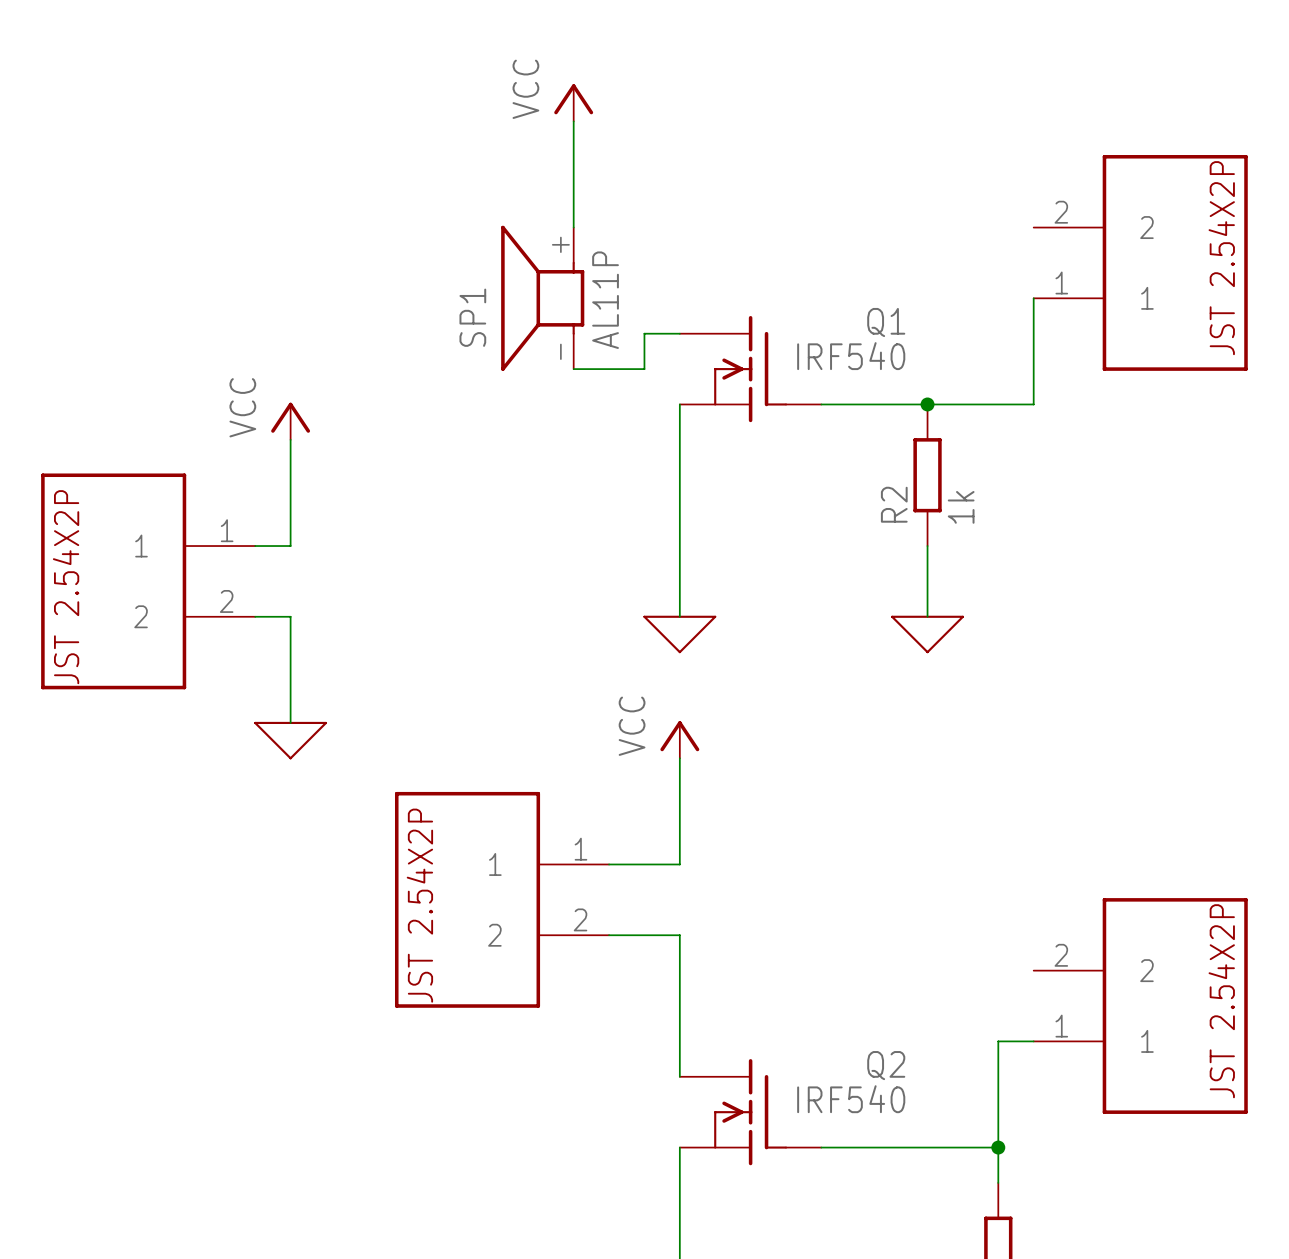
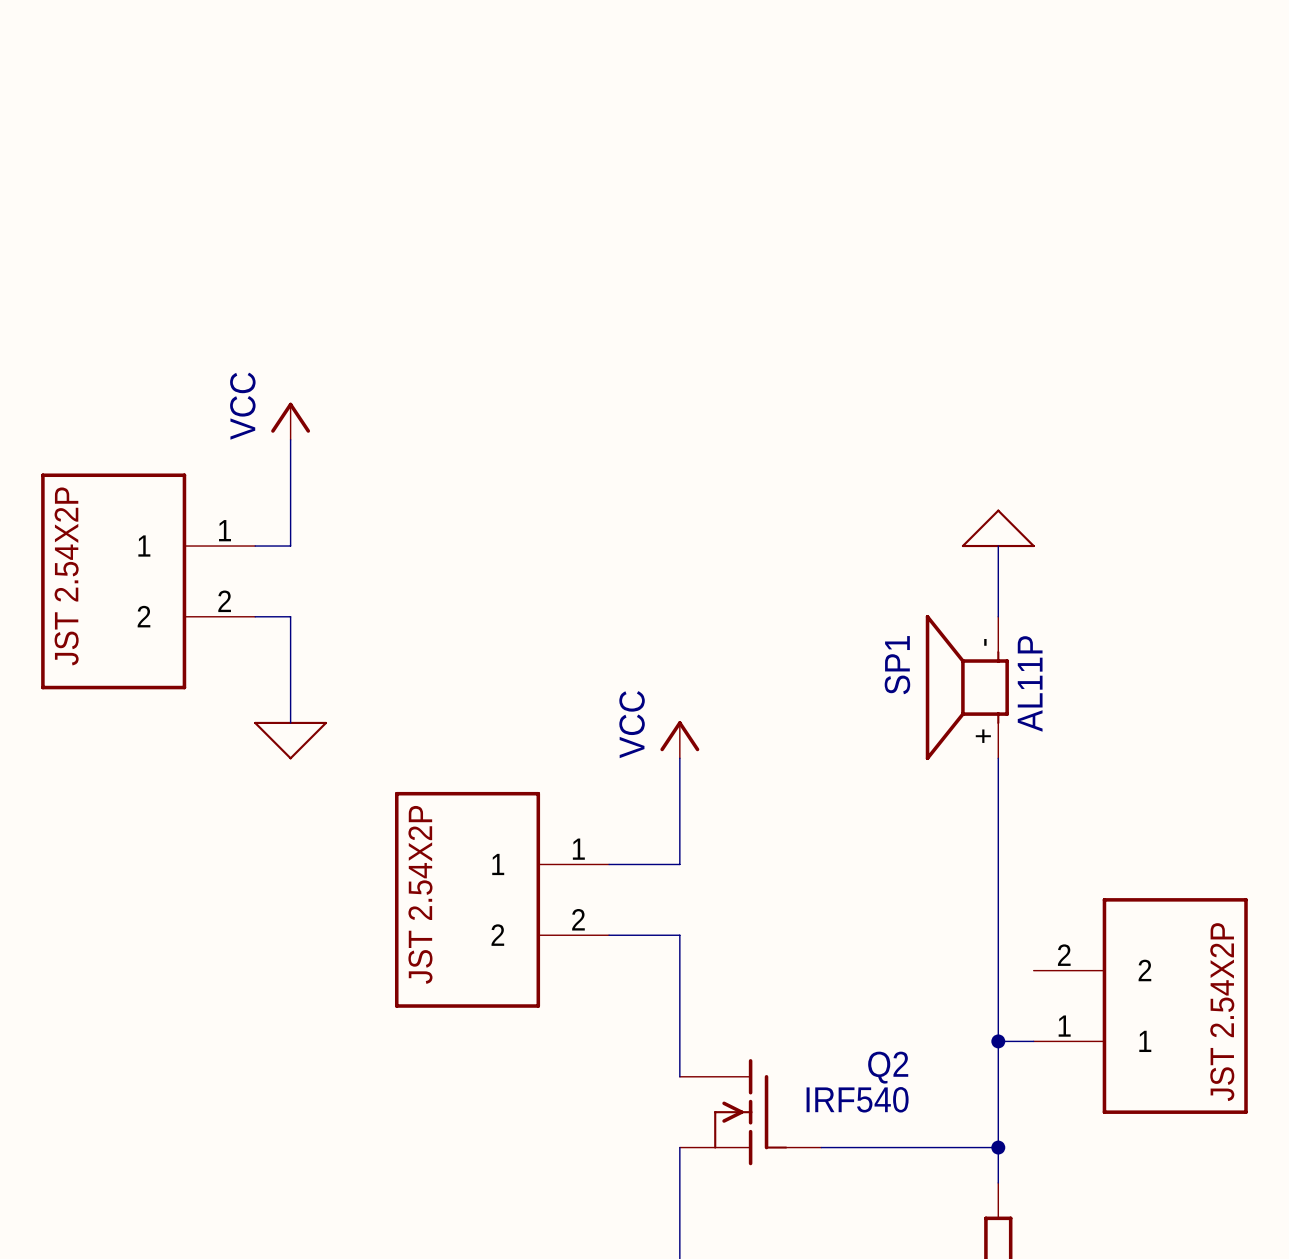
power symbol: VCC (573, 102) -> none
wire: (573, 121) (573, 227) -> none
part: (1140, 262) -> none
SP1 flip: as is (542, 298) -> up-down (967, 687)
SP1 position: (542, 298) -> (967, 687)
wire: (1033, 298) (1033, 404) (821, 404) -> none
wire: (679, 333) (644, 333) (644, 369) (573, 369) -> none
Q1: IRF540 (750, 369) -> none
wire: (679, 404) (679, 616) -> none
junction: (927, 404) -> none
R2: 1k (927, 475) -> none
wire: (927, 546) (927, 616) -> (998, 546) (998, 616)
power symbol: (679, 634) -> none
power symbol rotation: 0° (927, 634) -> 180° (998, 528)
power symbol position: (927, 634) -> (998, 528)
wire: none -> (998, 758) (998, 1041)
junction: none -> (998, 1041)

